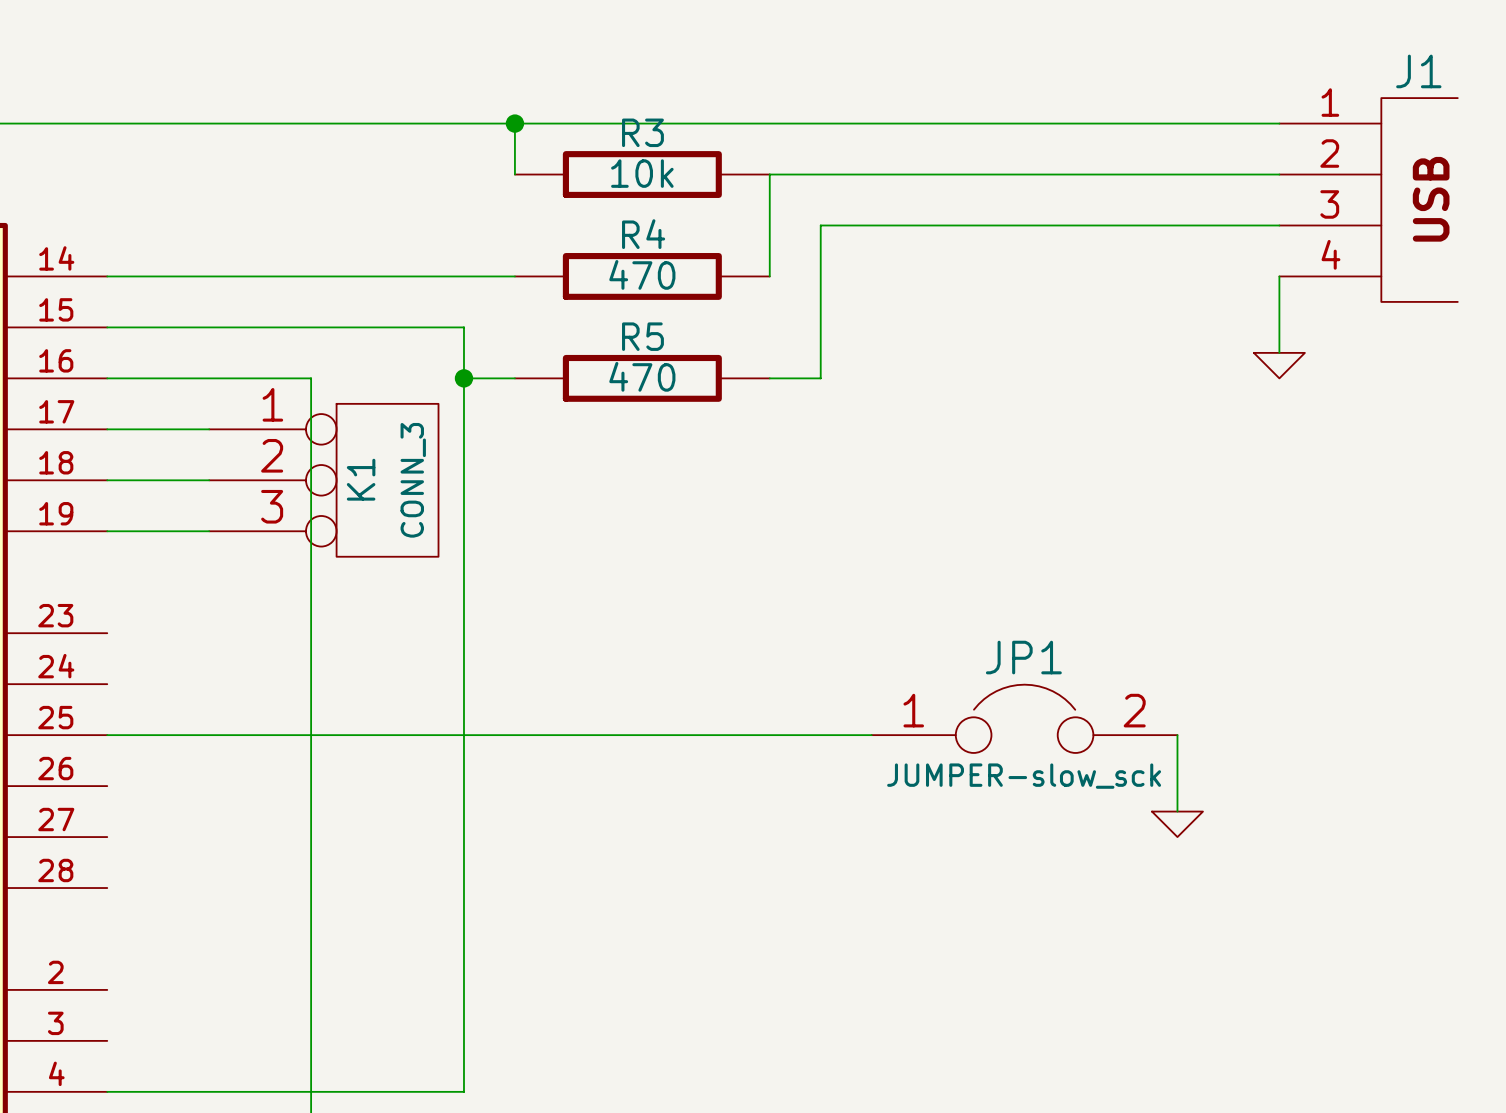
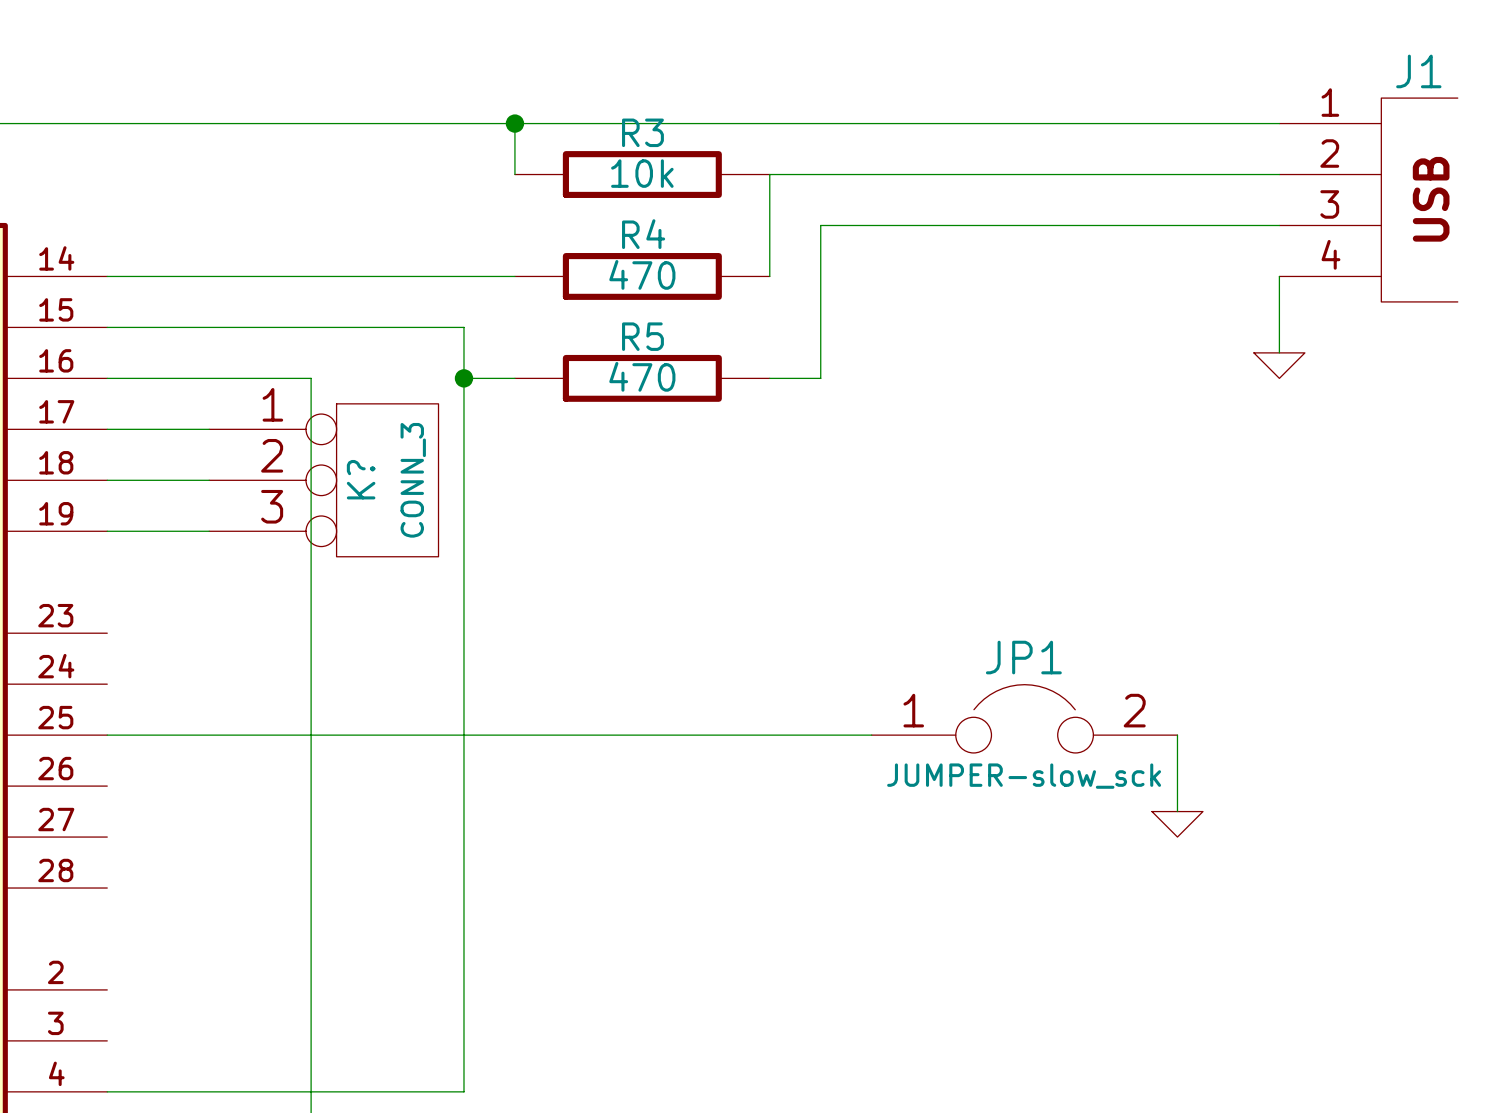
K1 name: K1 (361, 479) -> K? (361, 479)

